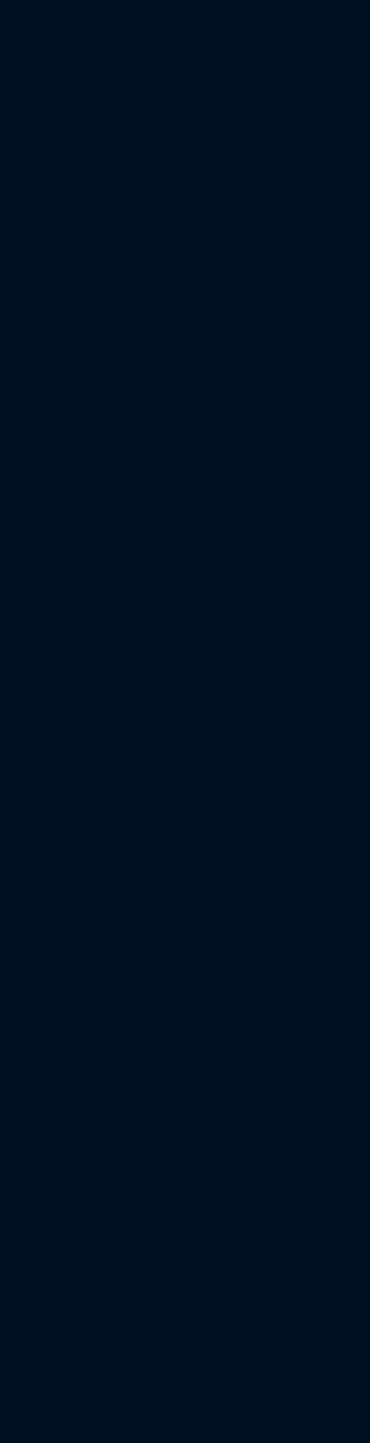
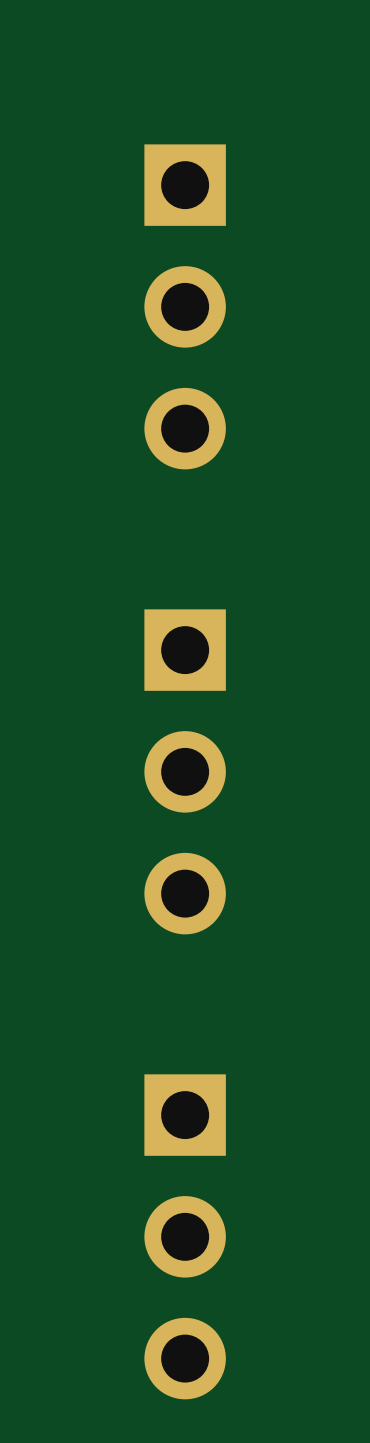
part: none -> (185, 306)
part: none -> (185, 771)
part: none -> (185, 1236)

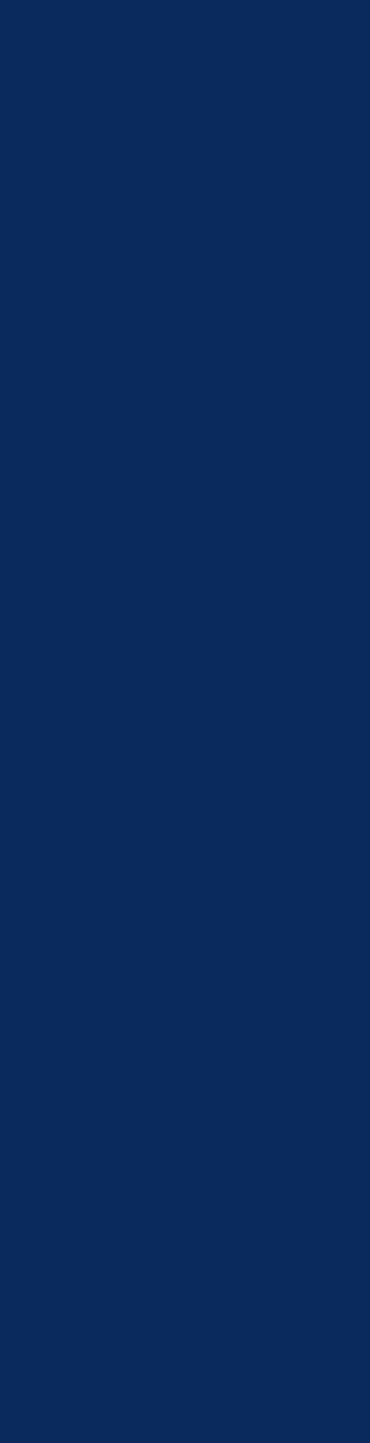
part: (185, 306) -> none
part: (185, 771) -> none
part: (185, 1236) -> none

